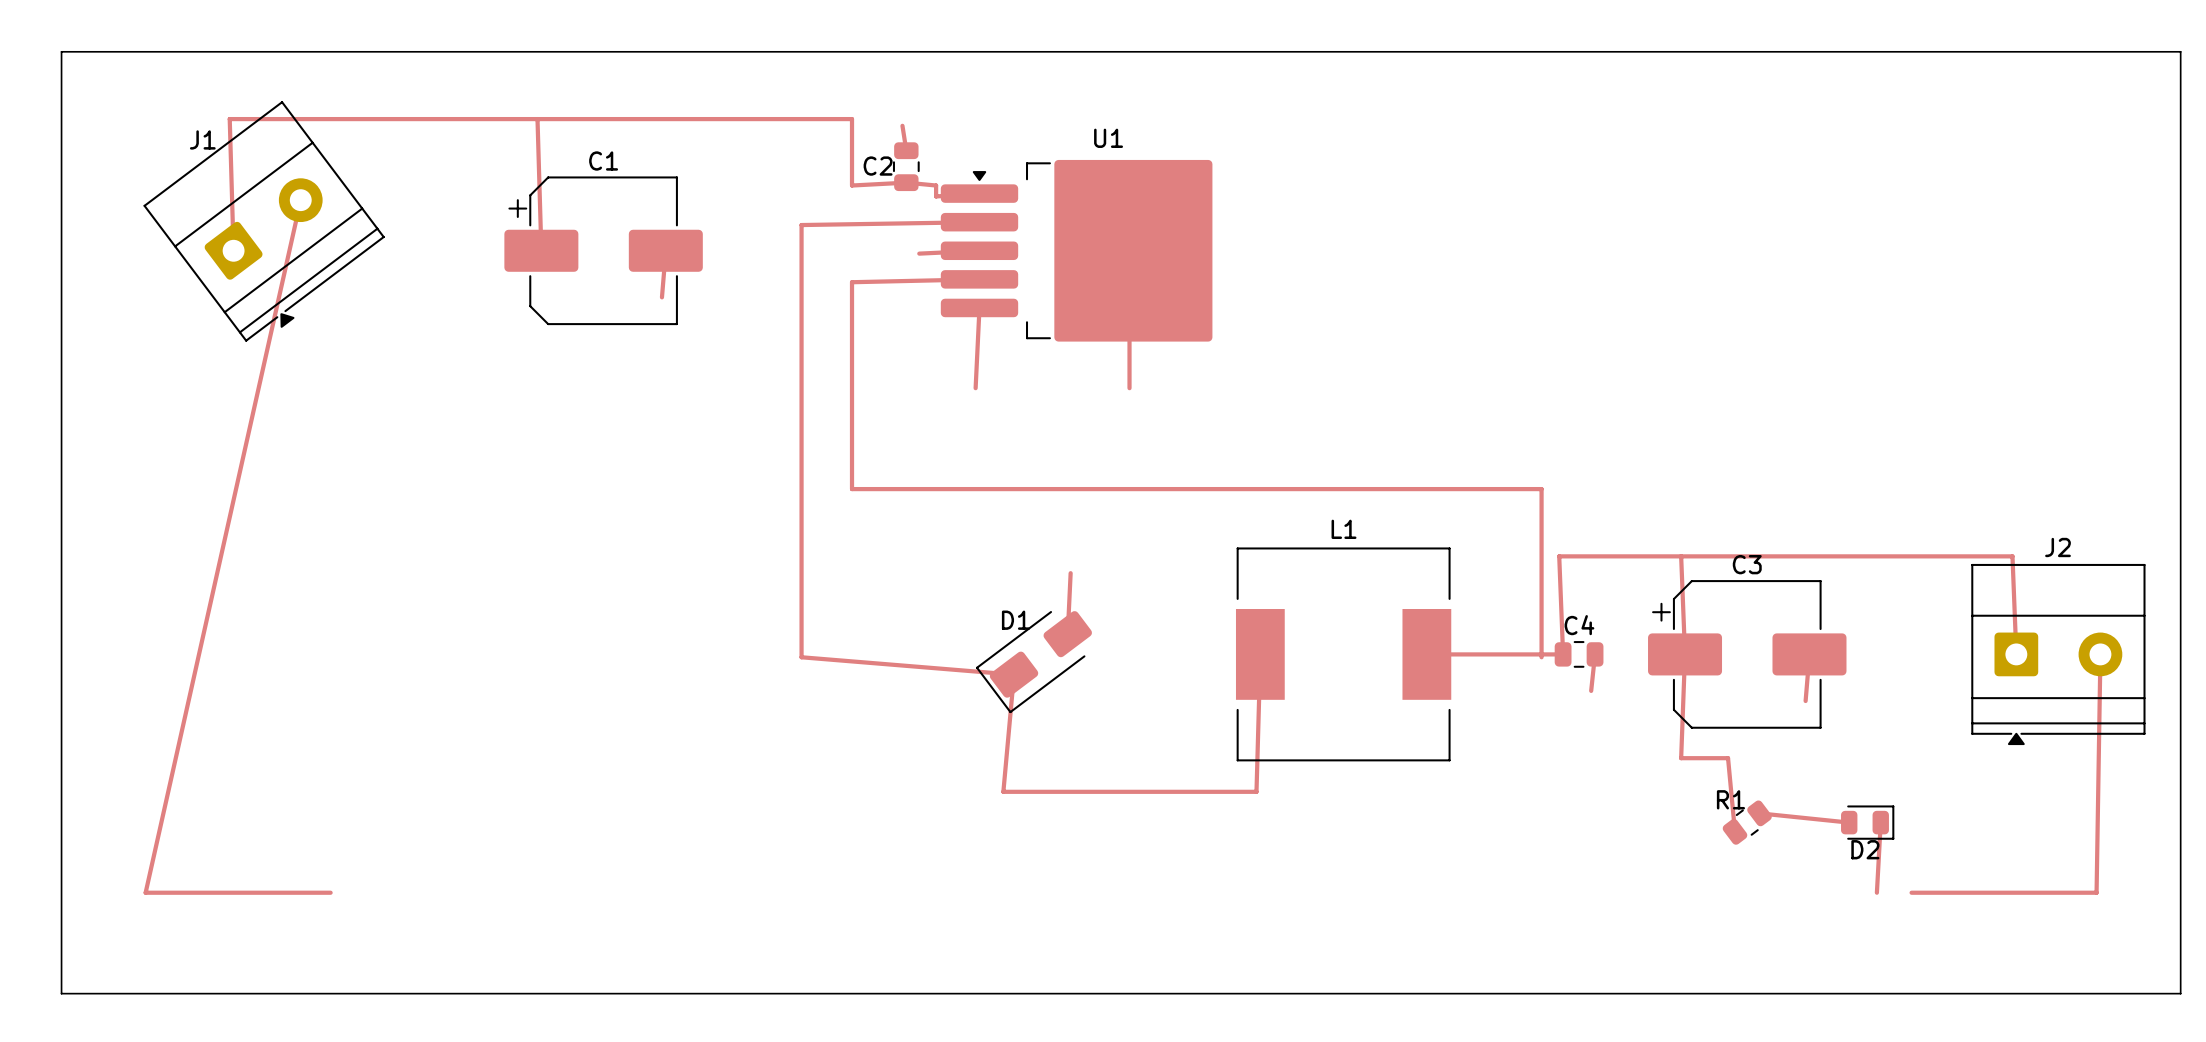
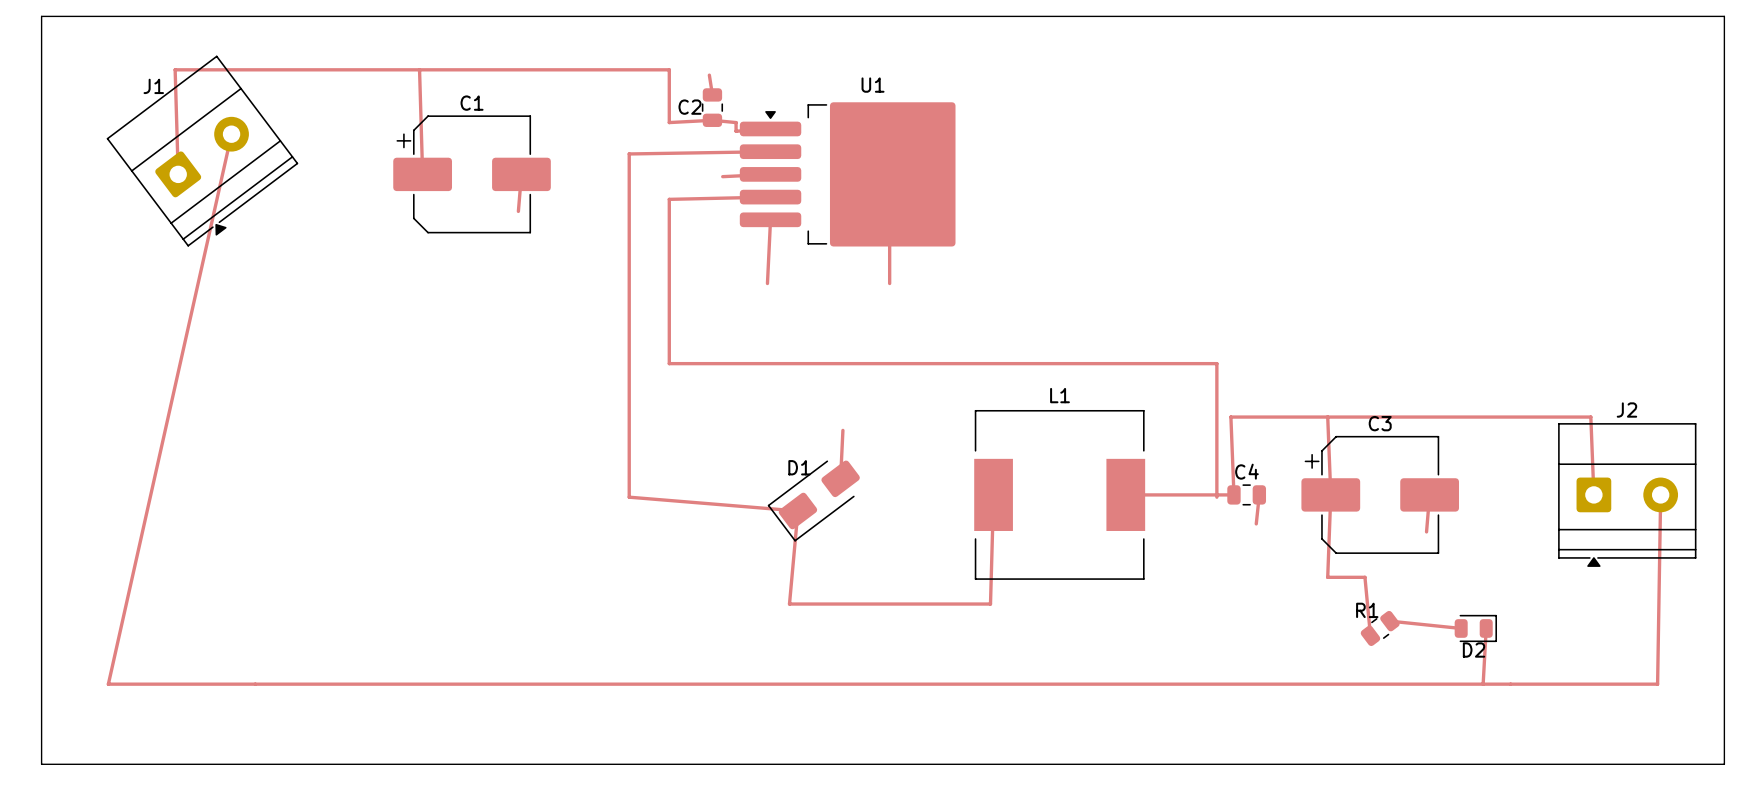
top track: none -> (255, 684) (1510, 684)

